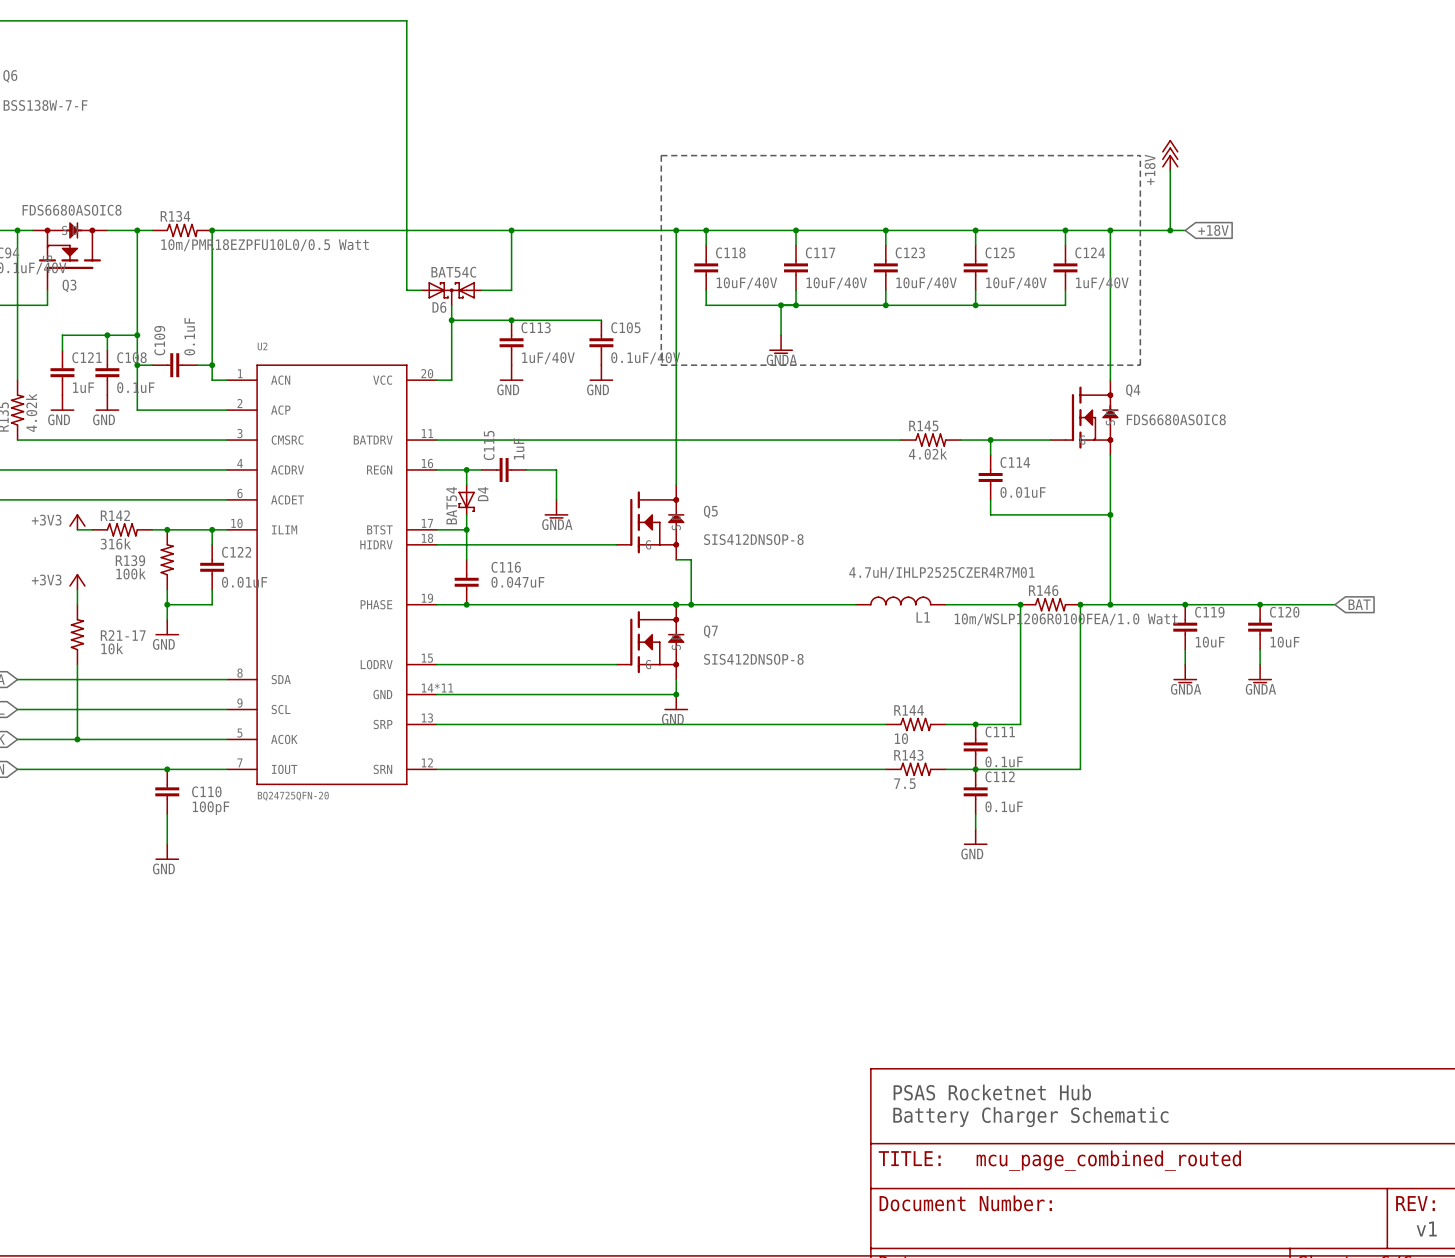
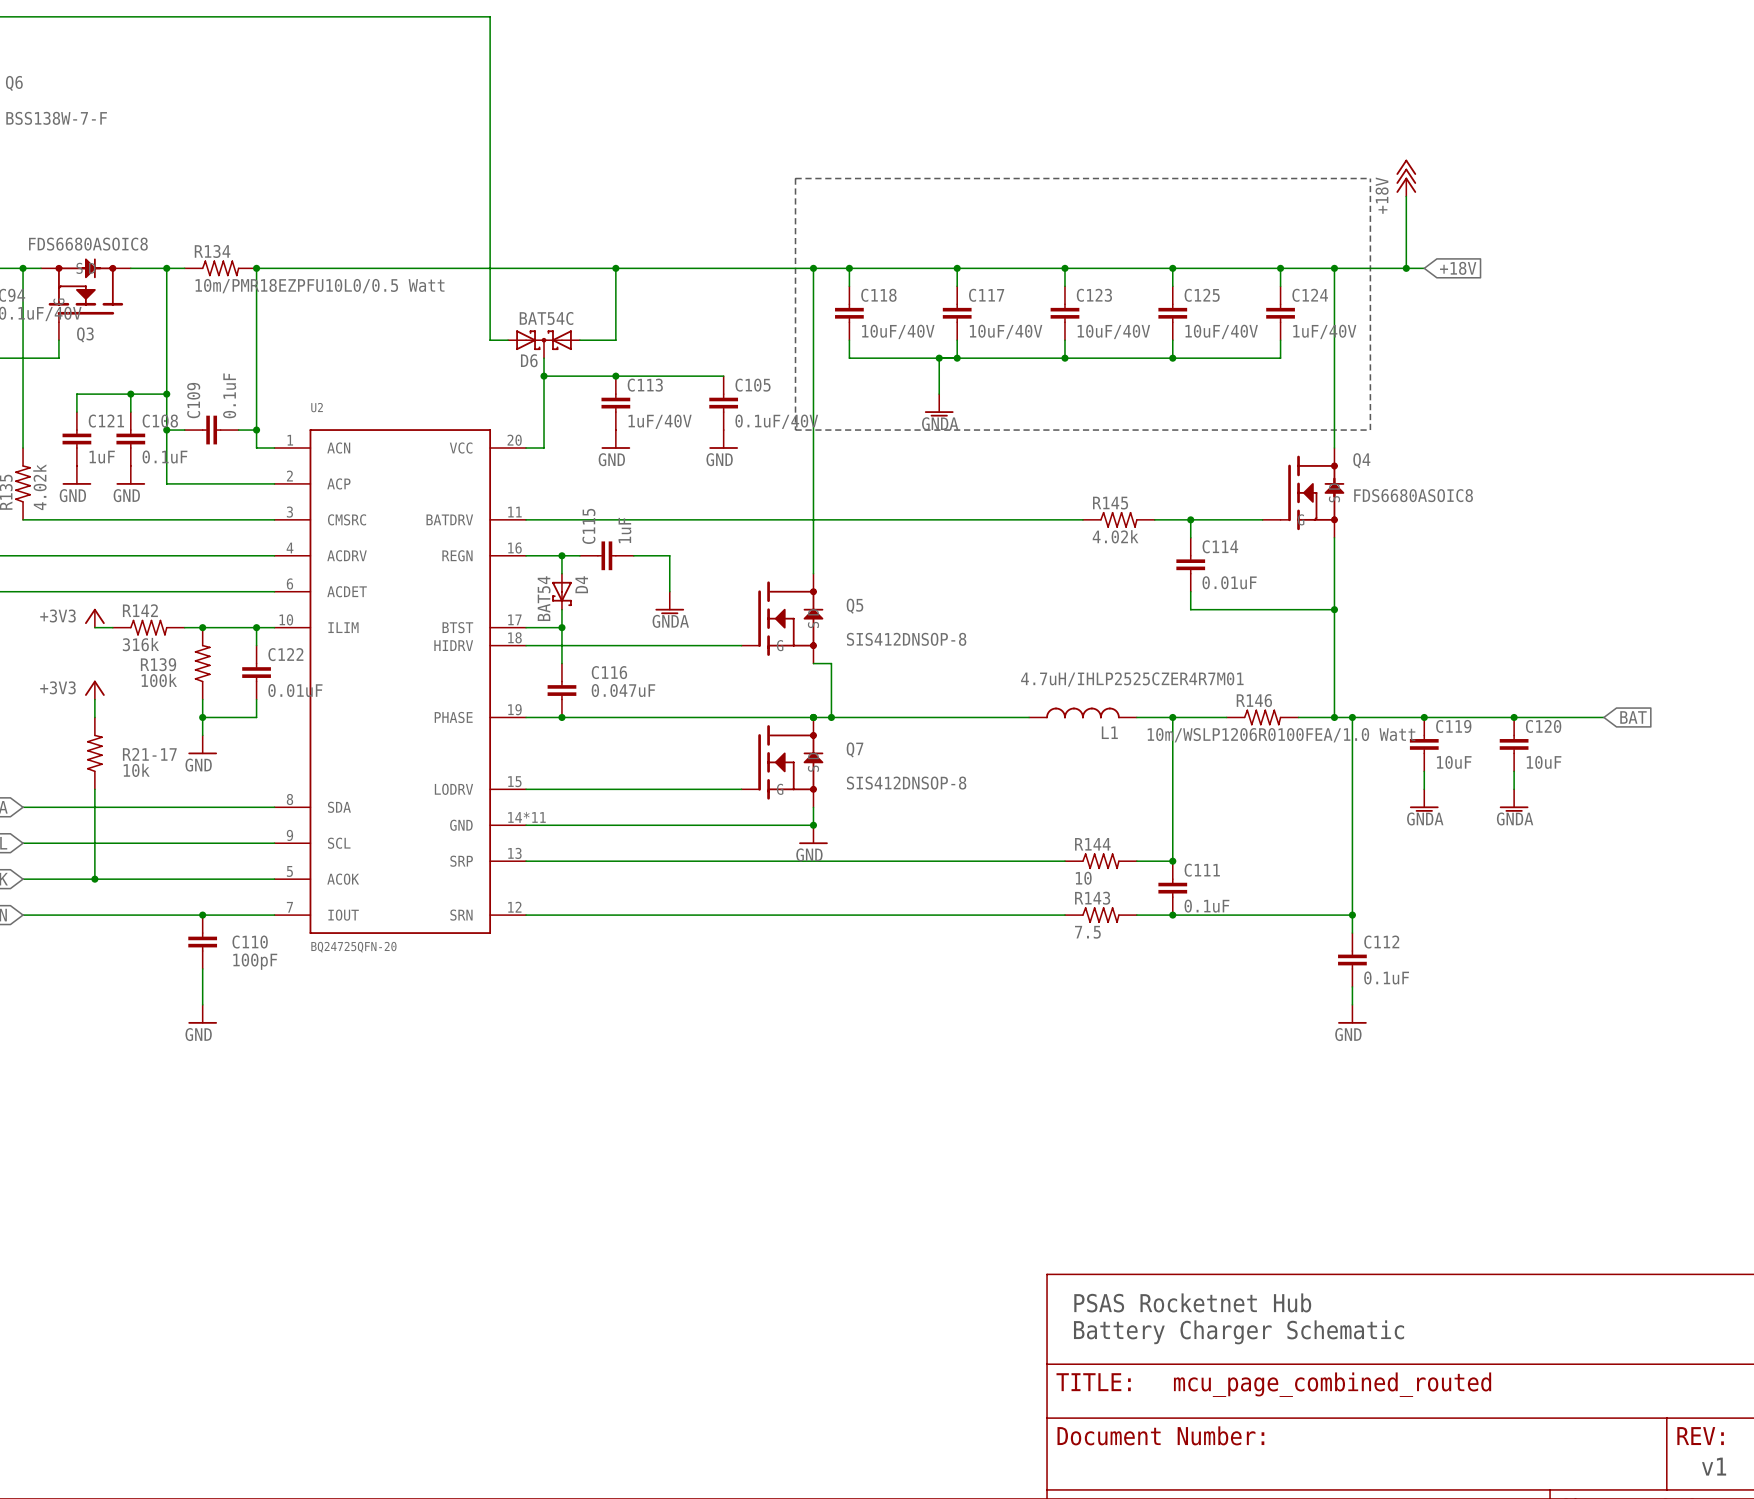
junction: none -> (1172, 717)
wire: (1020, 604) (1020, 724) (975, 724) -> (1172, 717) (1172, 861)
junction: (1020, 604) -> none
wire: (1080, 604) (1080, 769) -> (1352, 915) (1298, 915)
junction: (1080, 604) -> none
wire: none -> (1352, 717) (1352, 933)
junction: none -> (1352, 717)
junction: none -> (1352, 915)
C112 position: (975, 791) -> (1352, 960)
wire: (975, 814) (975, 829) -> none
wire: none -> (1352, 986) (1352, 1004)
power symbol: GND (975, 837) -> none
power symbol: none -> GND (1352, 1014)

